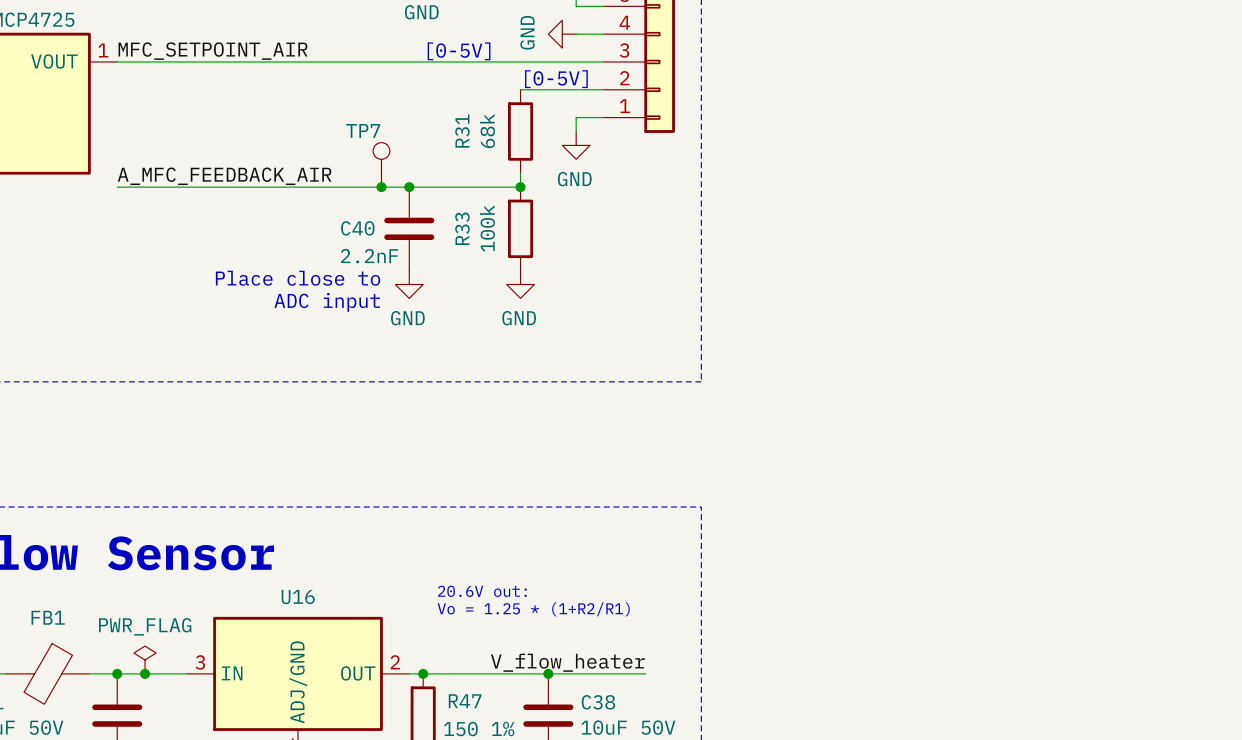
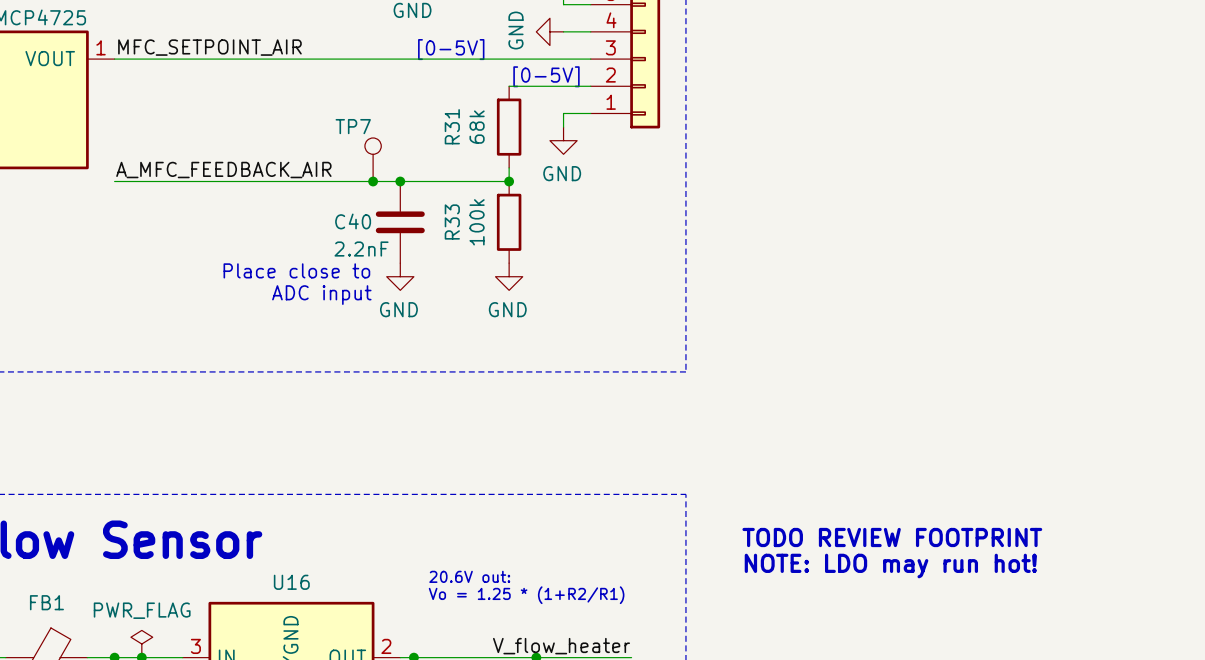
text: none -> TODO REVIEW FOOTPRINT (892, 537)
text: none -> NOTE: LDO may run hot! (890, 566)

